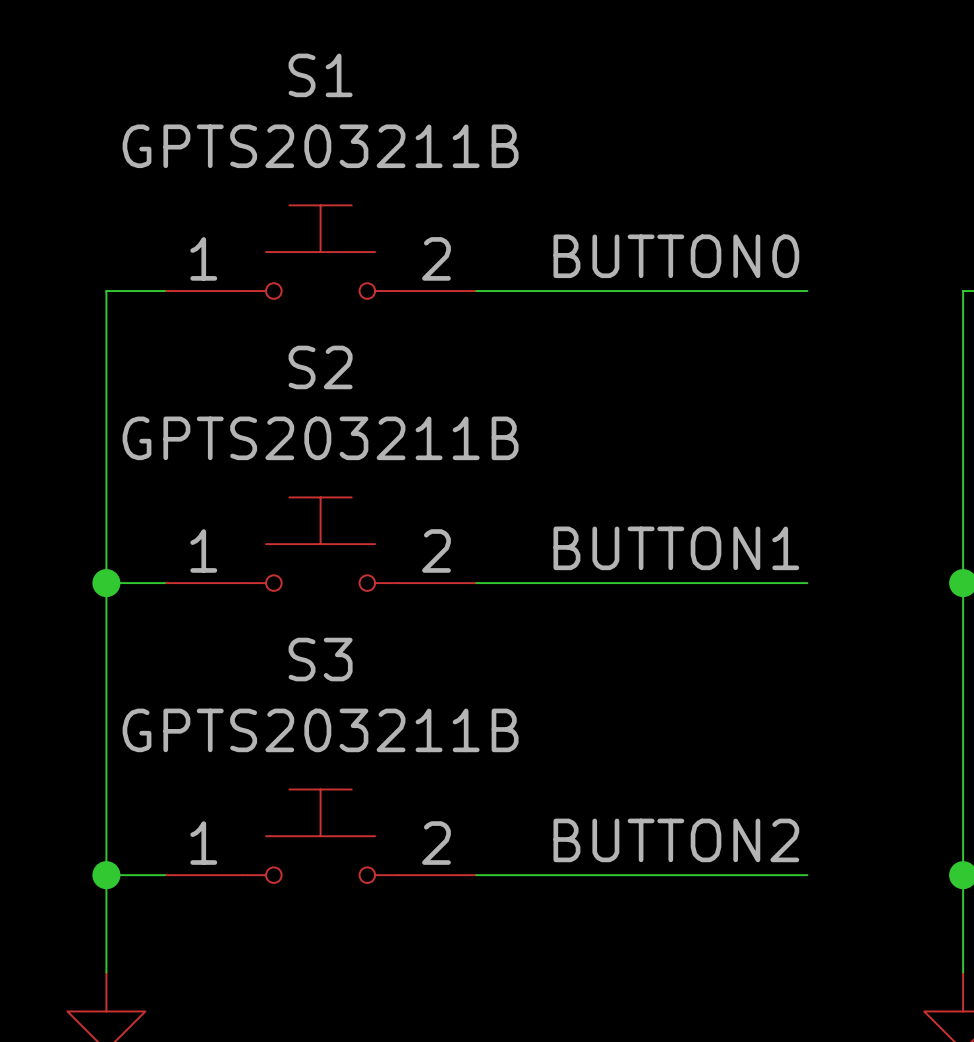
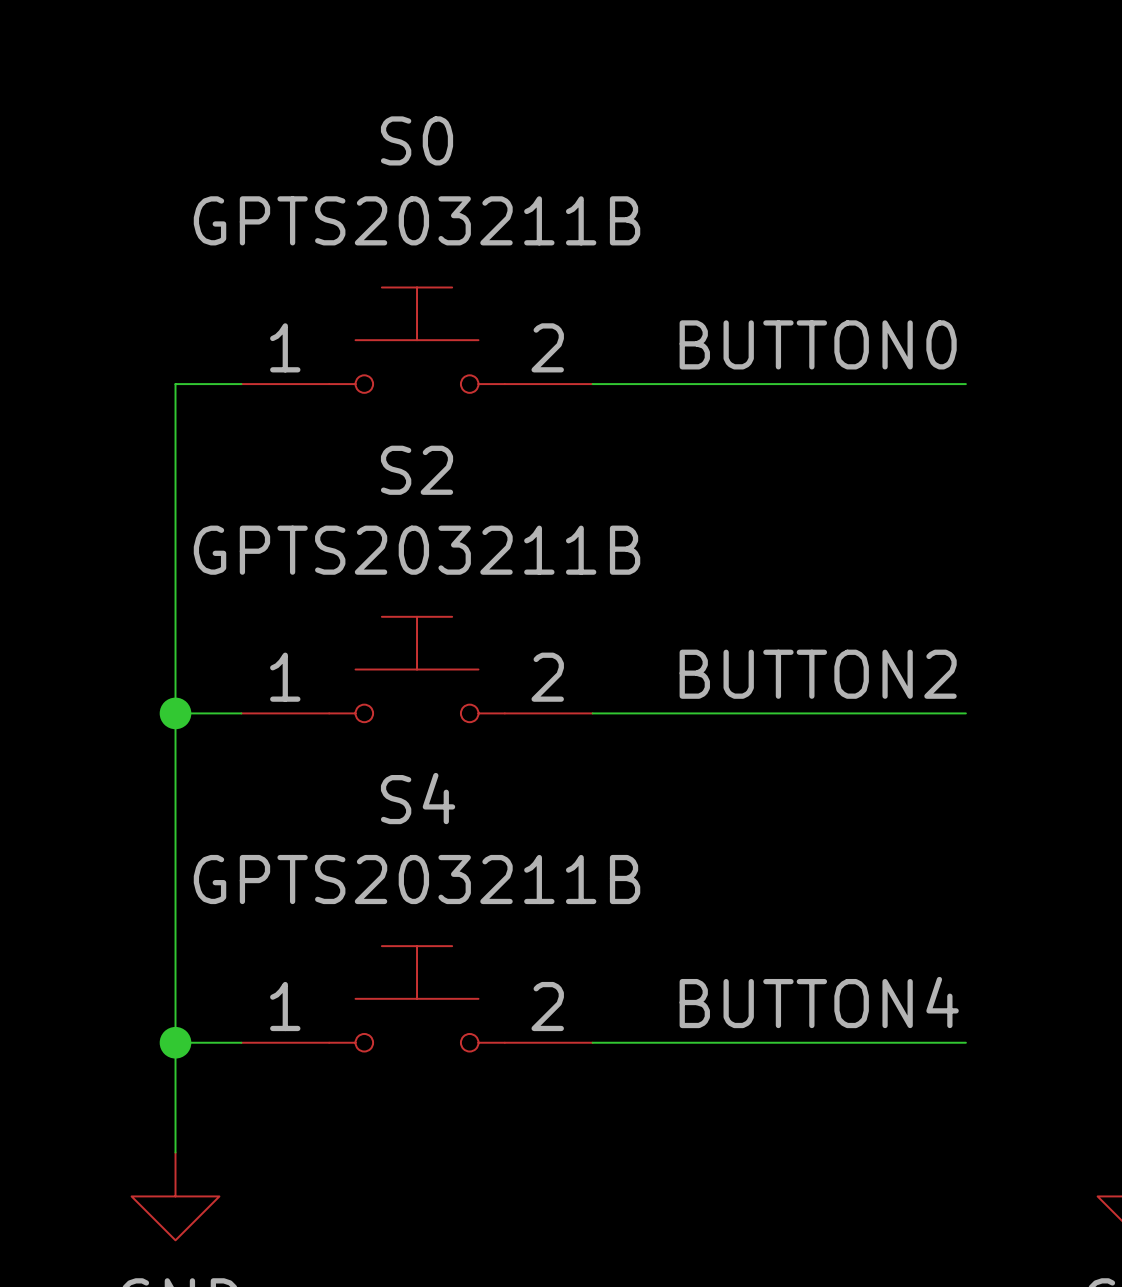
S1 name: S1 (320, 75) -> S0 (417, 140)
label: BUTTON1 (676, 548) -> BUTTON2 (818, 674)
S3 name: S3 (320, 659) -> S4 (418, 798)
label: BUTTON2 (676, 840) -> BUTTON4 (819, 1002)

